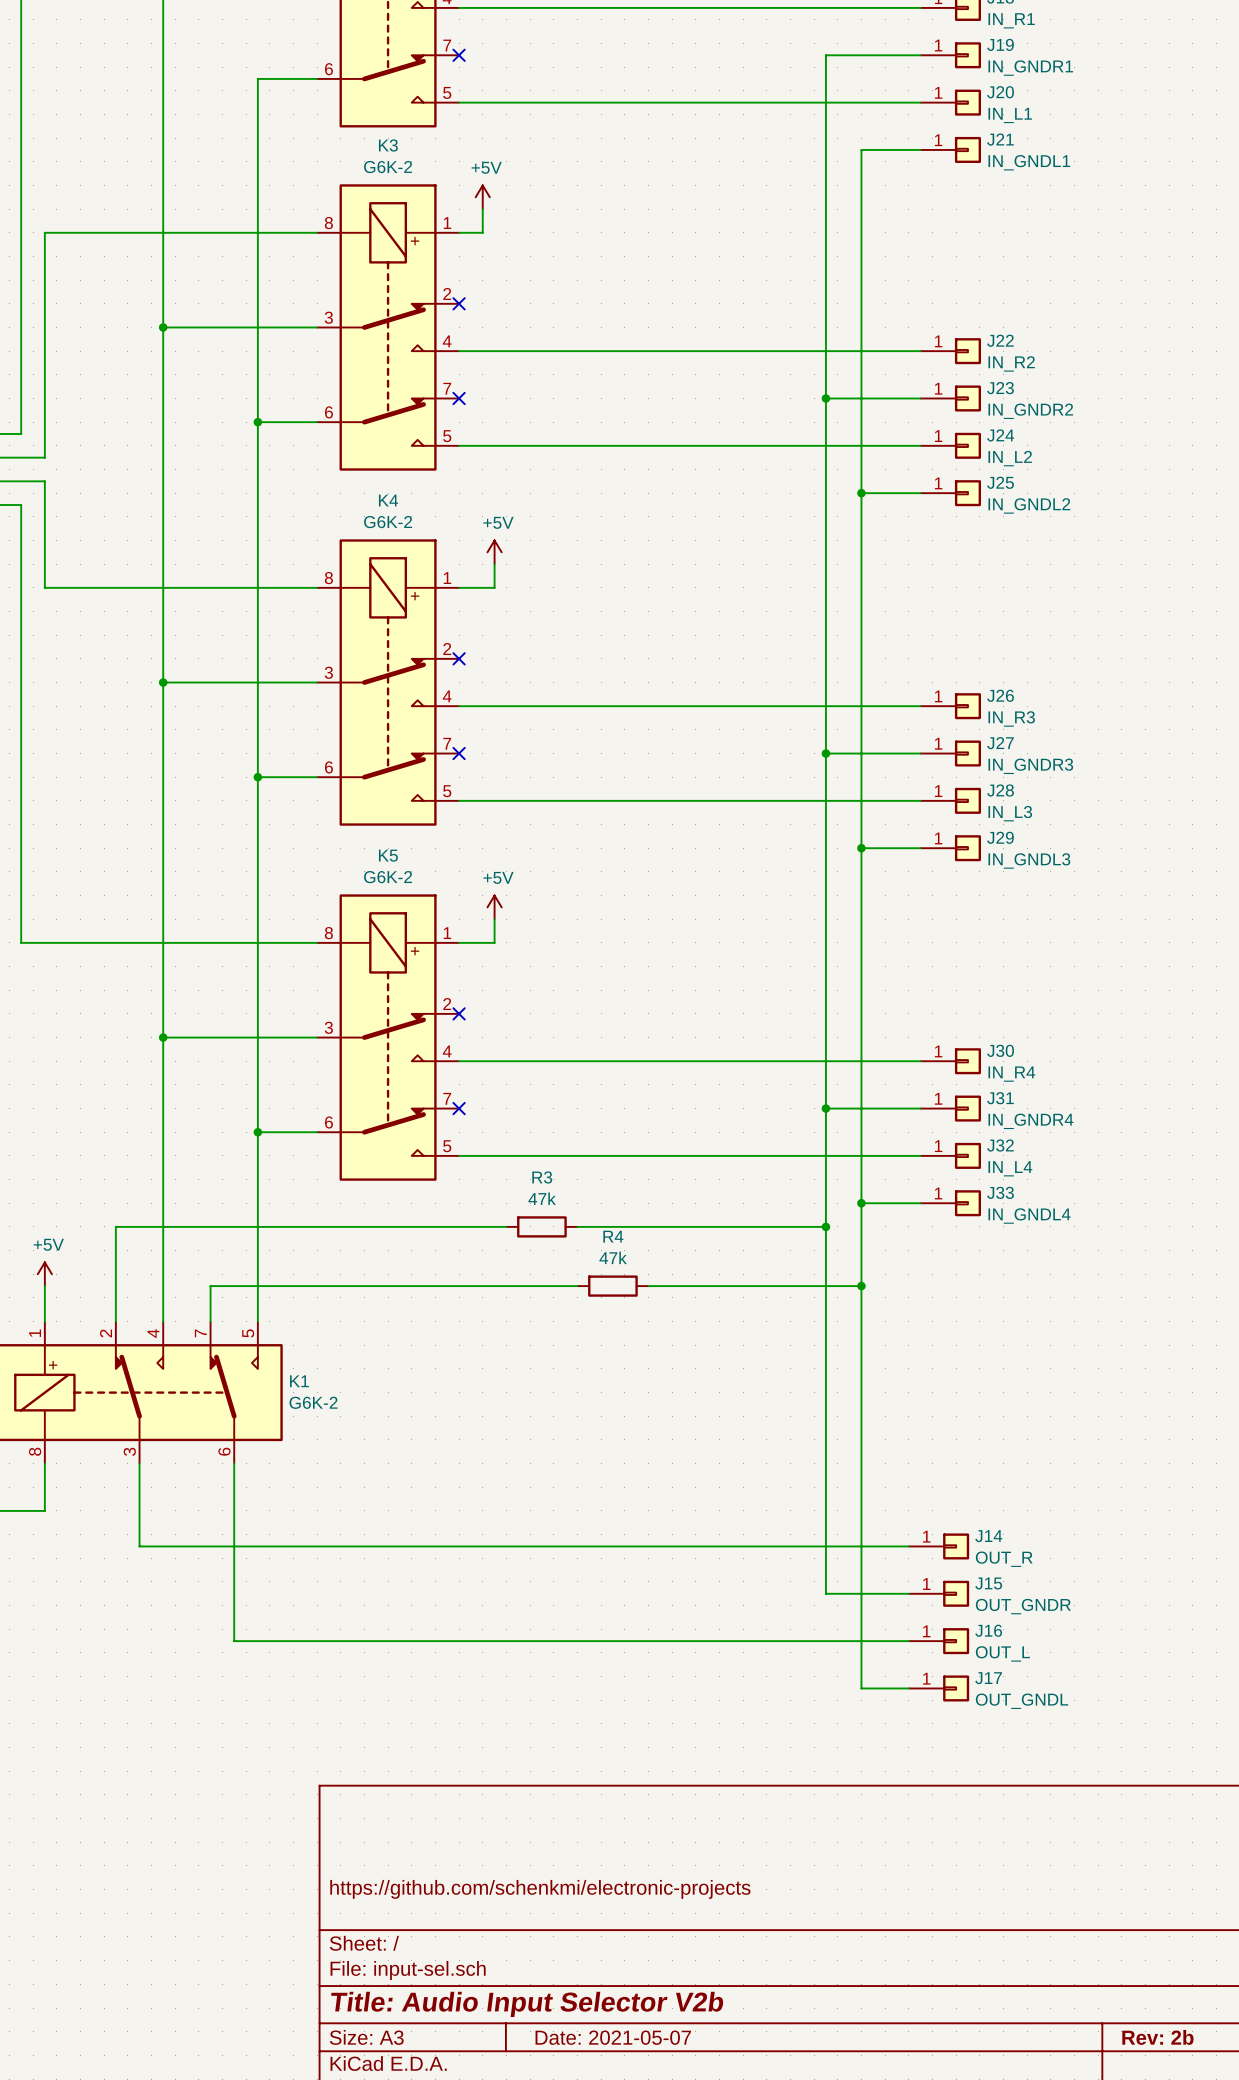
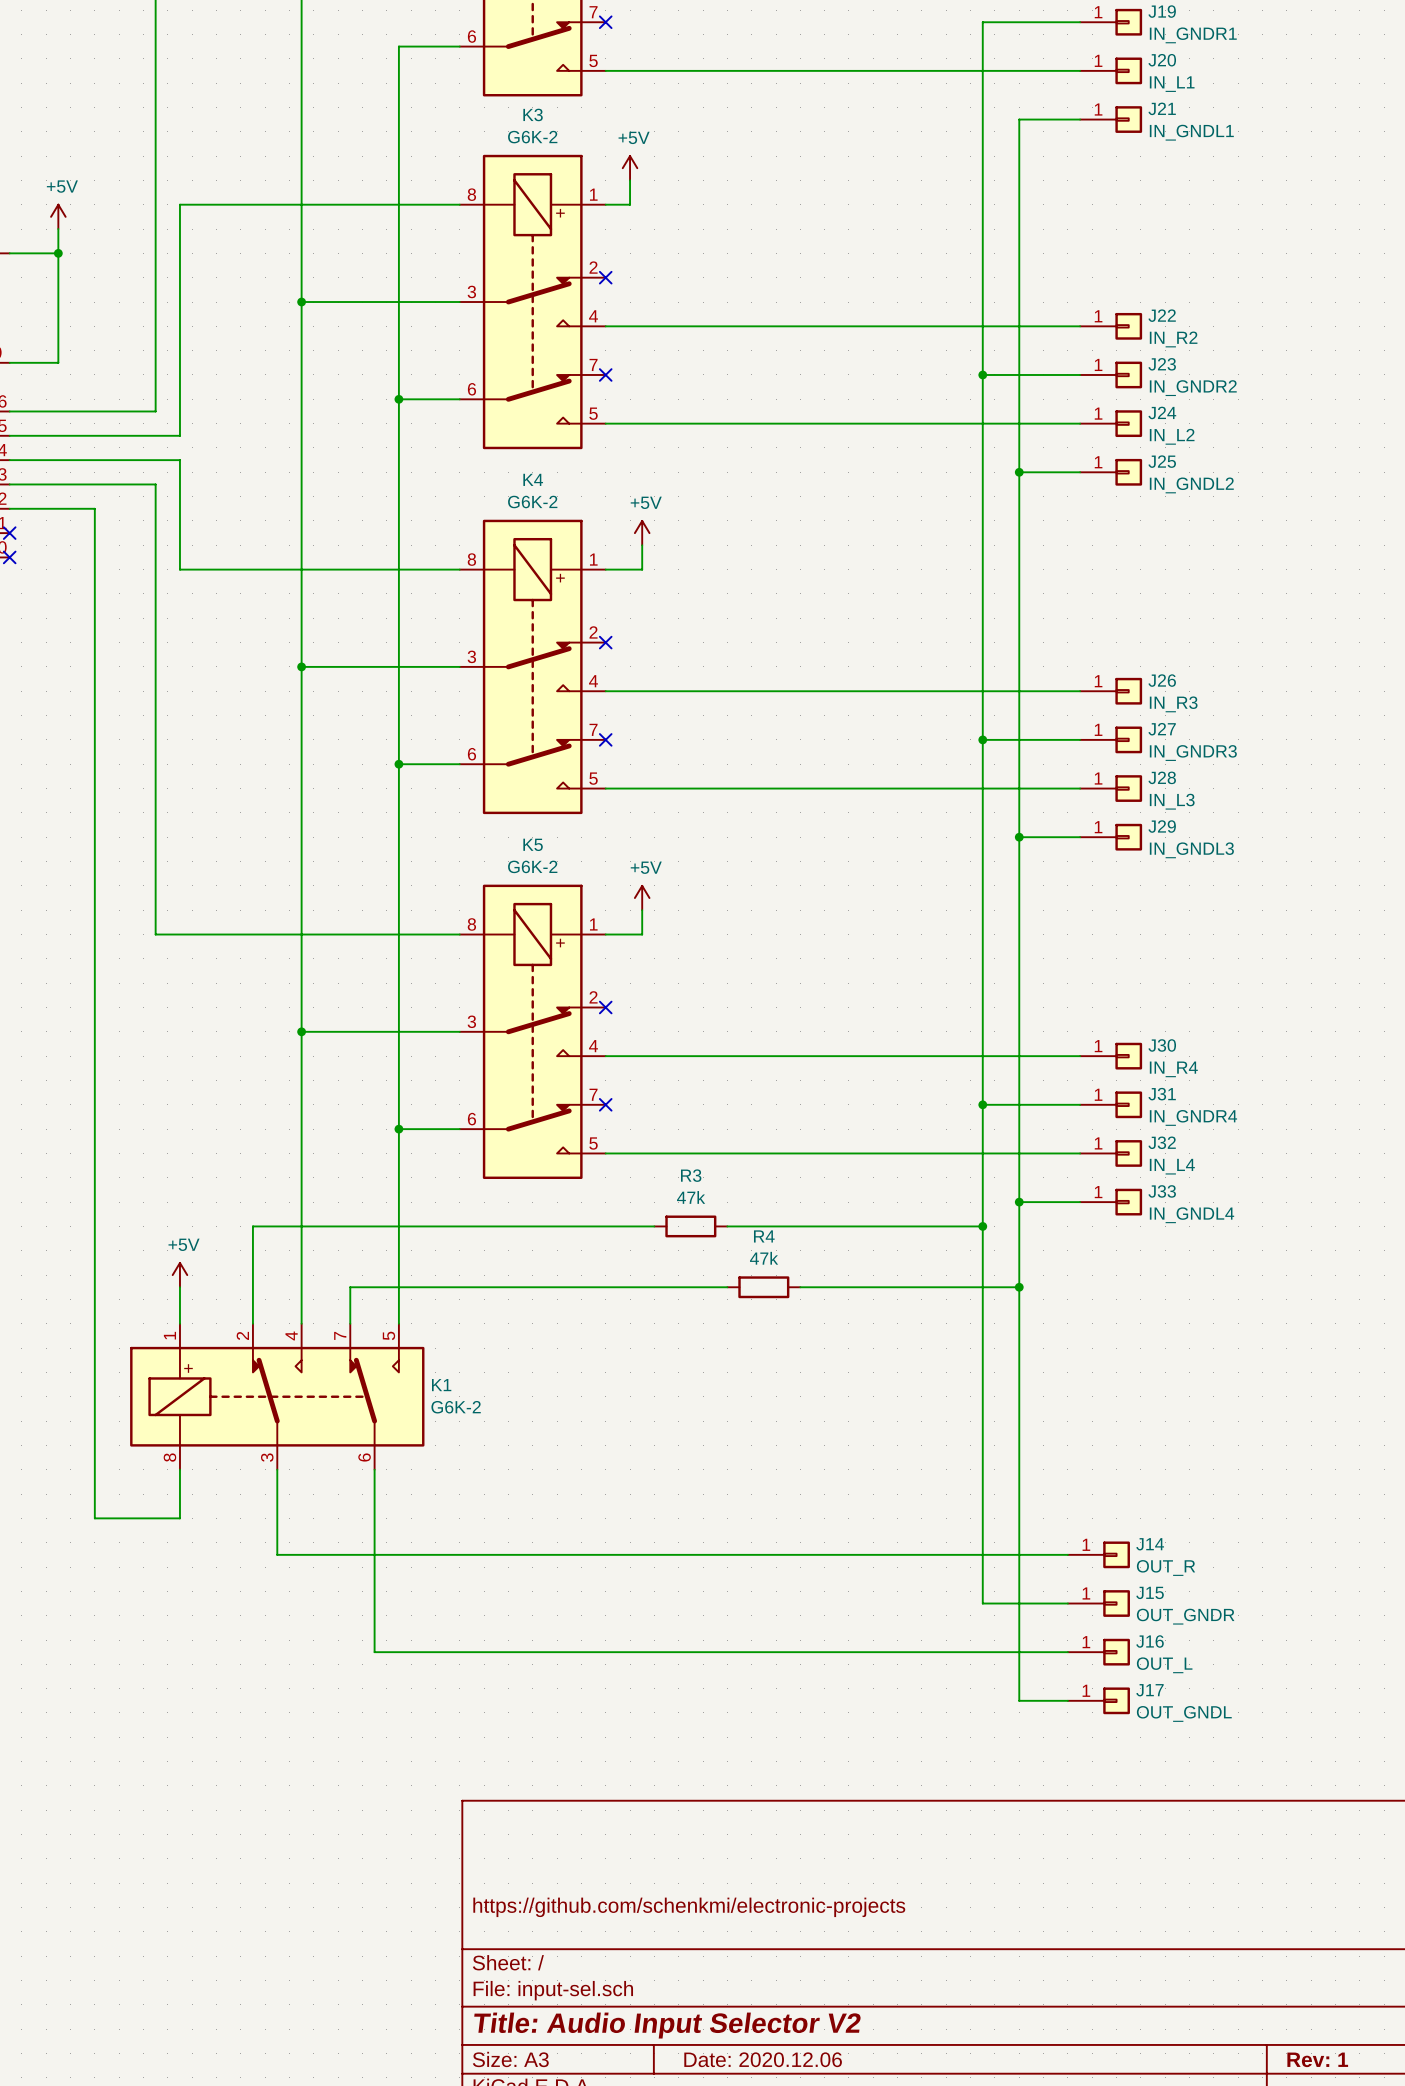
title block: Title: Audio Input Selector V2b (527, 2004) -> Title: Audio Input Selector V2 (667, 2025)
title block: Date: 2021-05-07 (613, 2037) -> Date: 2020.12.06 (763, 2059)
title block: Rev: 2b (1157, 2037) -> Rev: 1 (1317, 2059)

